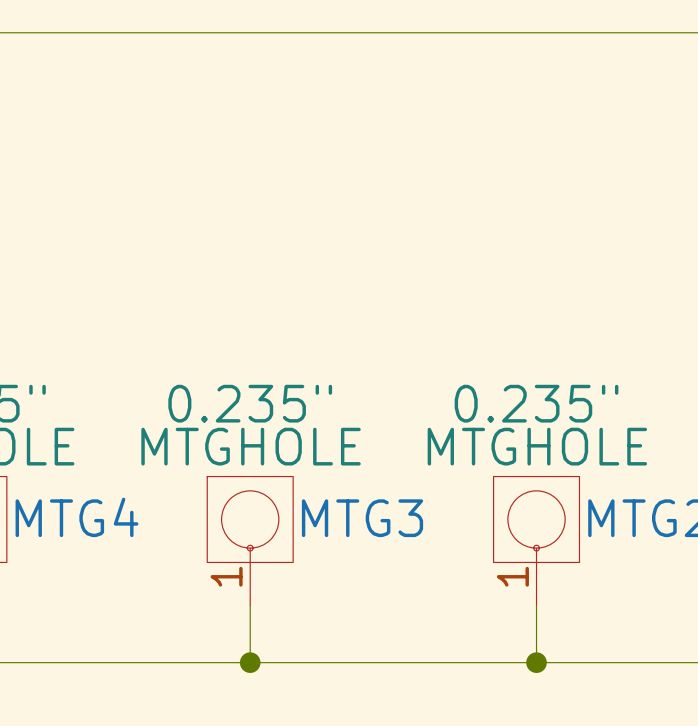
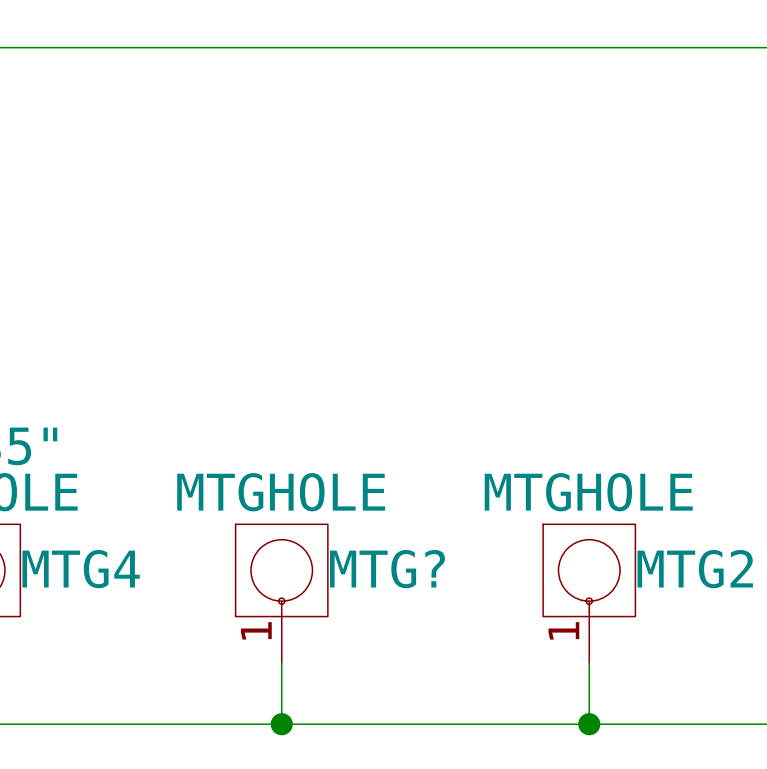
MTG3 text: 0.235" (250, 403) -> none
MTG2 text: 0.235" (536, 403) -> none
MTG3 name: MTG3 (362, 518) -> MTG? (387, 569)

